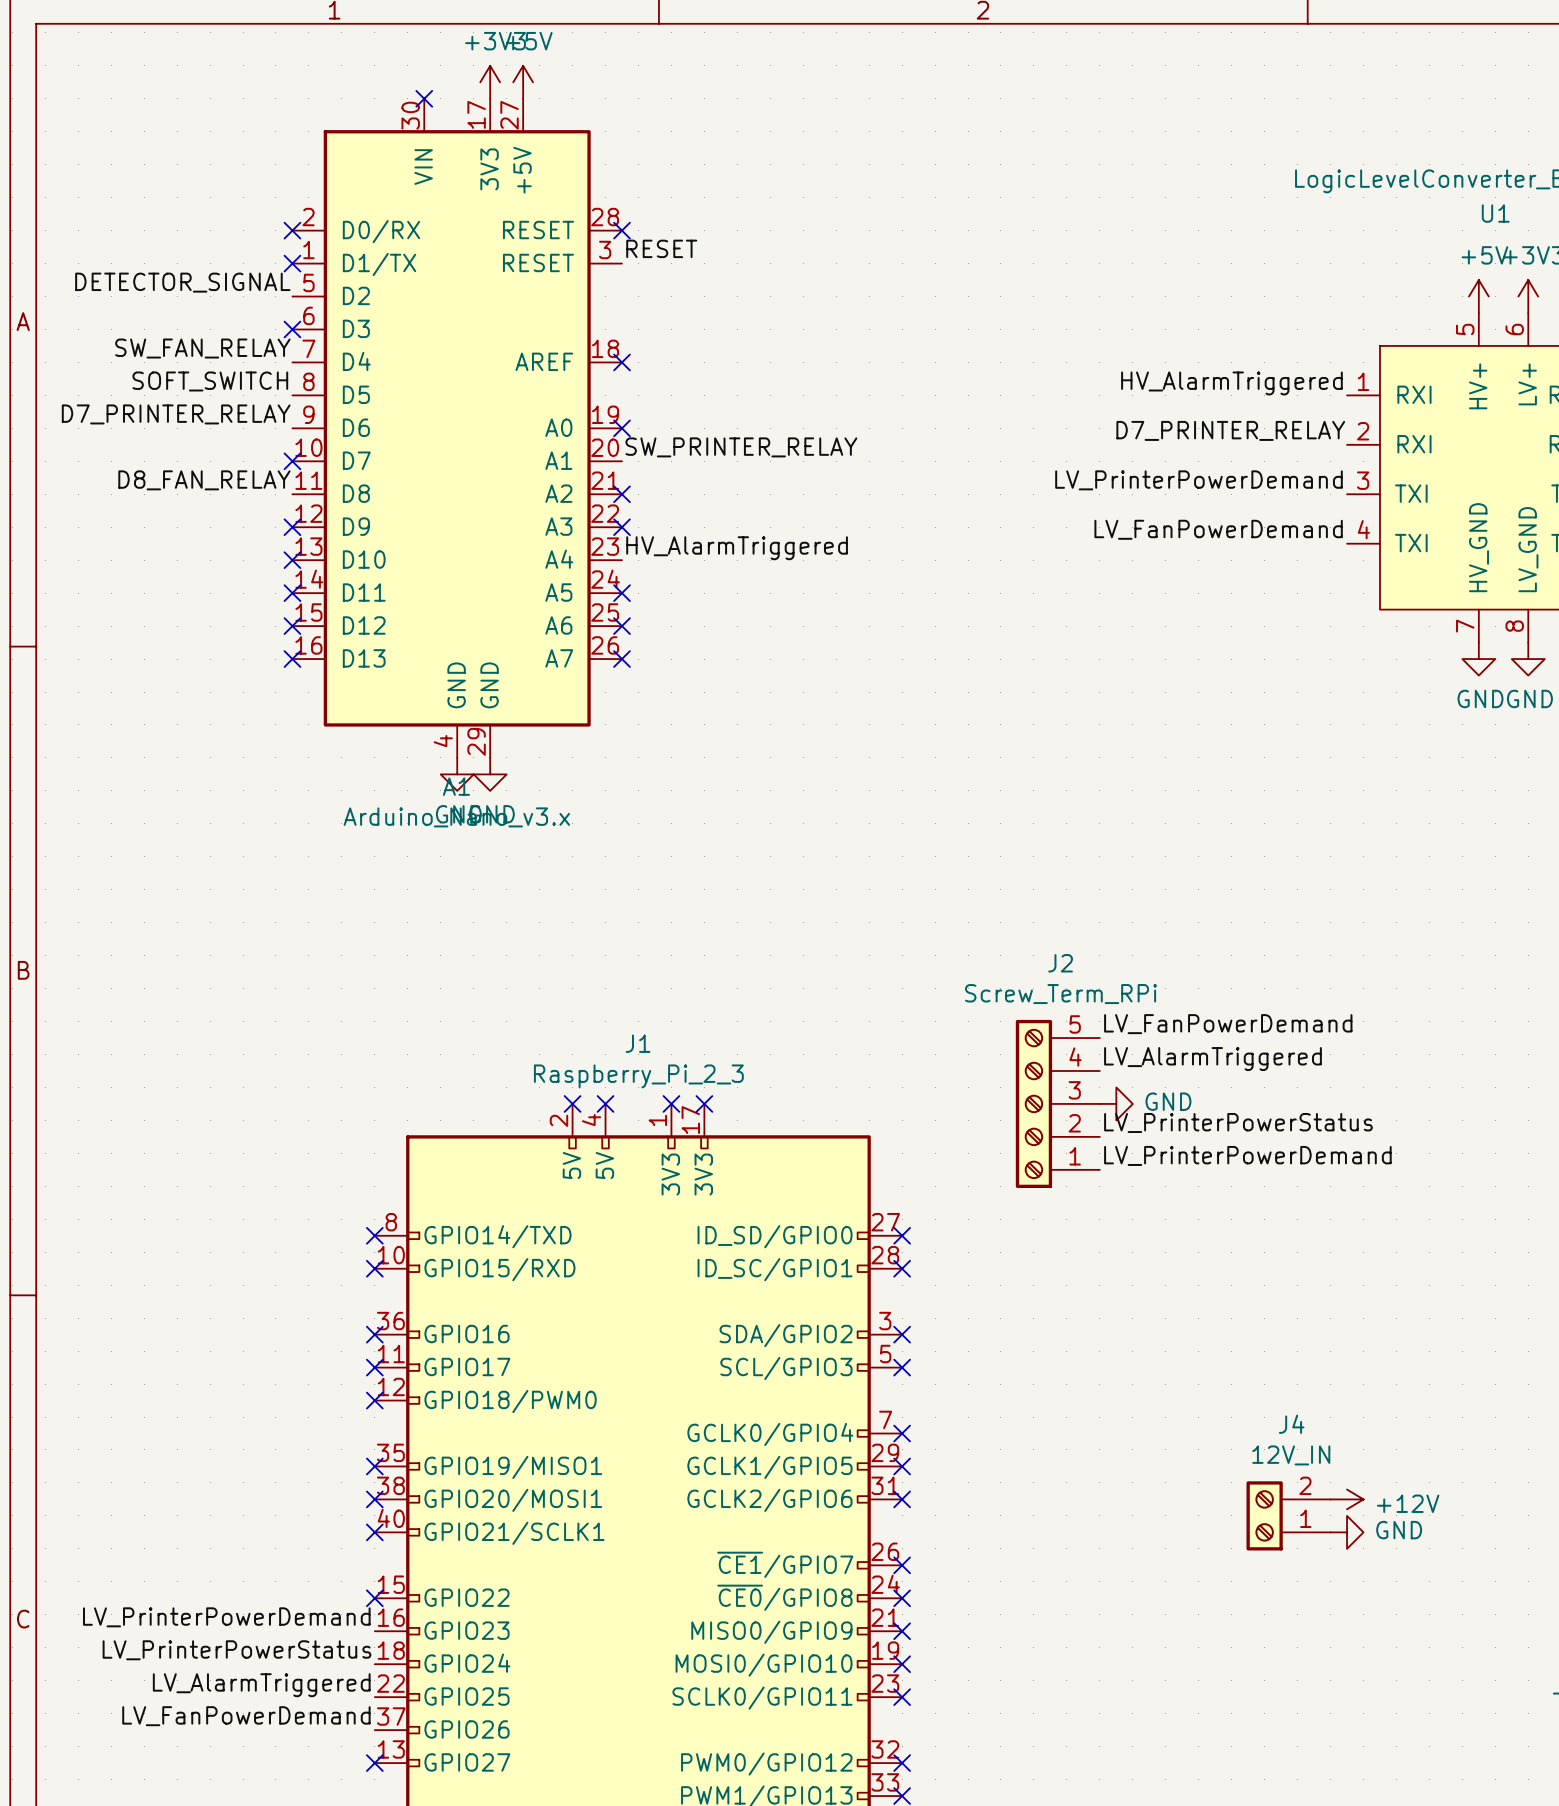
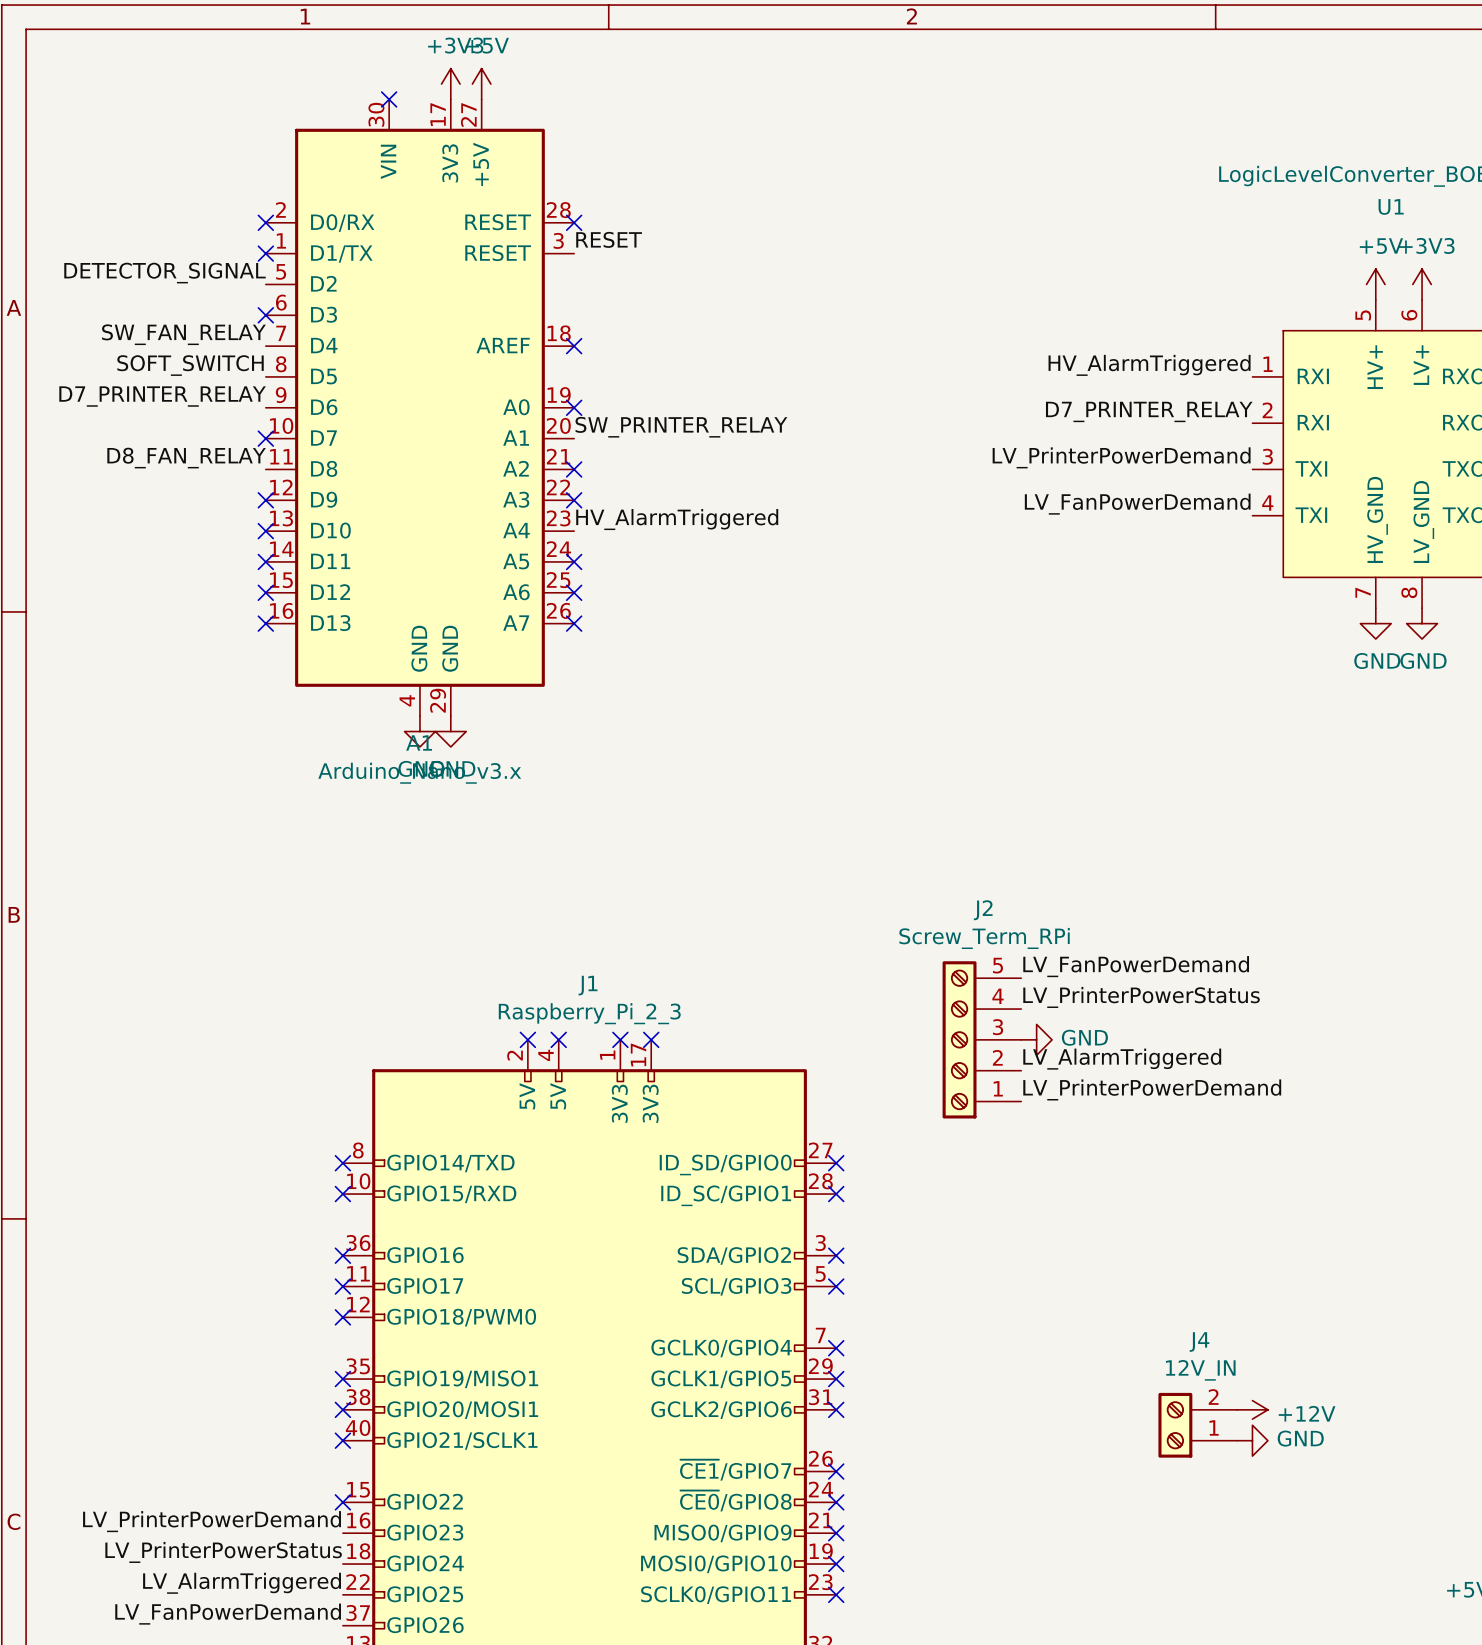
label: LV_AlarmTriggered (1212, 1059) -> LV_PrinterPowerStatus (1141, 997)
label: LV_PrinterPowerStatus (1238, 1122) -> LV_AlarmTriggered (1122, 1059)

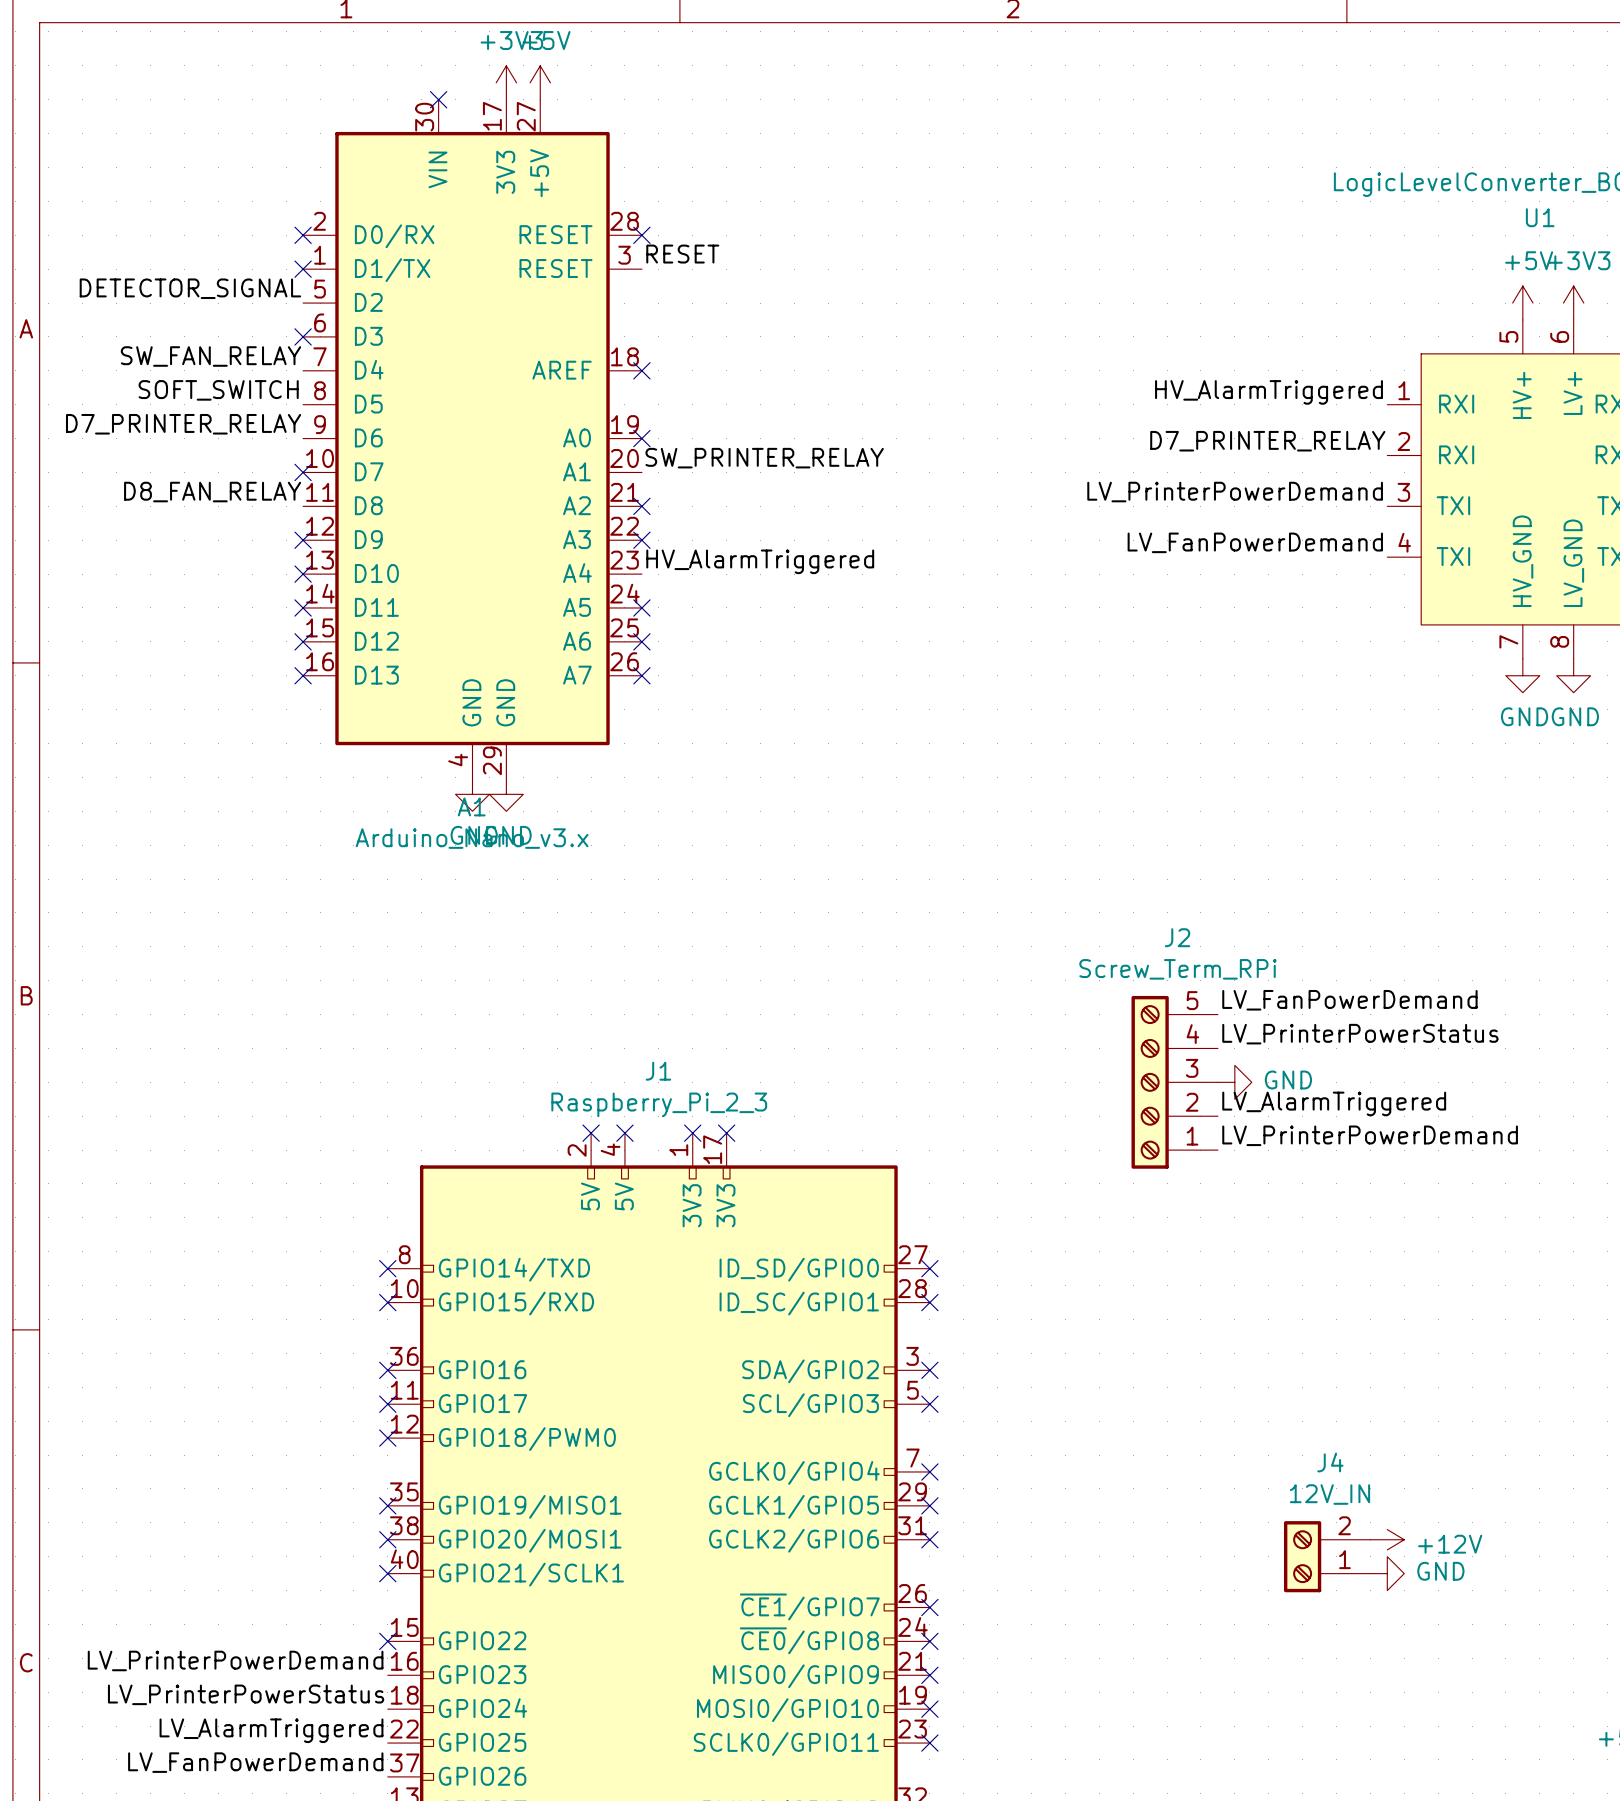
label position: LV_FanPowerDemand (1136, 966) -> LV_FanPowerDemand (1349, 1000)
label position: LV_PrinterPowerStatus (1141, 997) -> LV_PrinterPowerStatus (1360, 1034)
J2 position: (981, 1039) -> (1174, 1082)
power symbol position: GND (1036, 1039) -> GND (1234, 1082)
label position: LV_AlarmTriggered (1122, 1059) -> LV_AlarmTriggered (1334, 1103)
label position: LV_PrinterPowerDemand (1152, 1089) -> LV_PrinterPowerDemand (1370, 1135)

